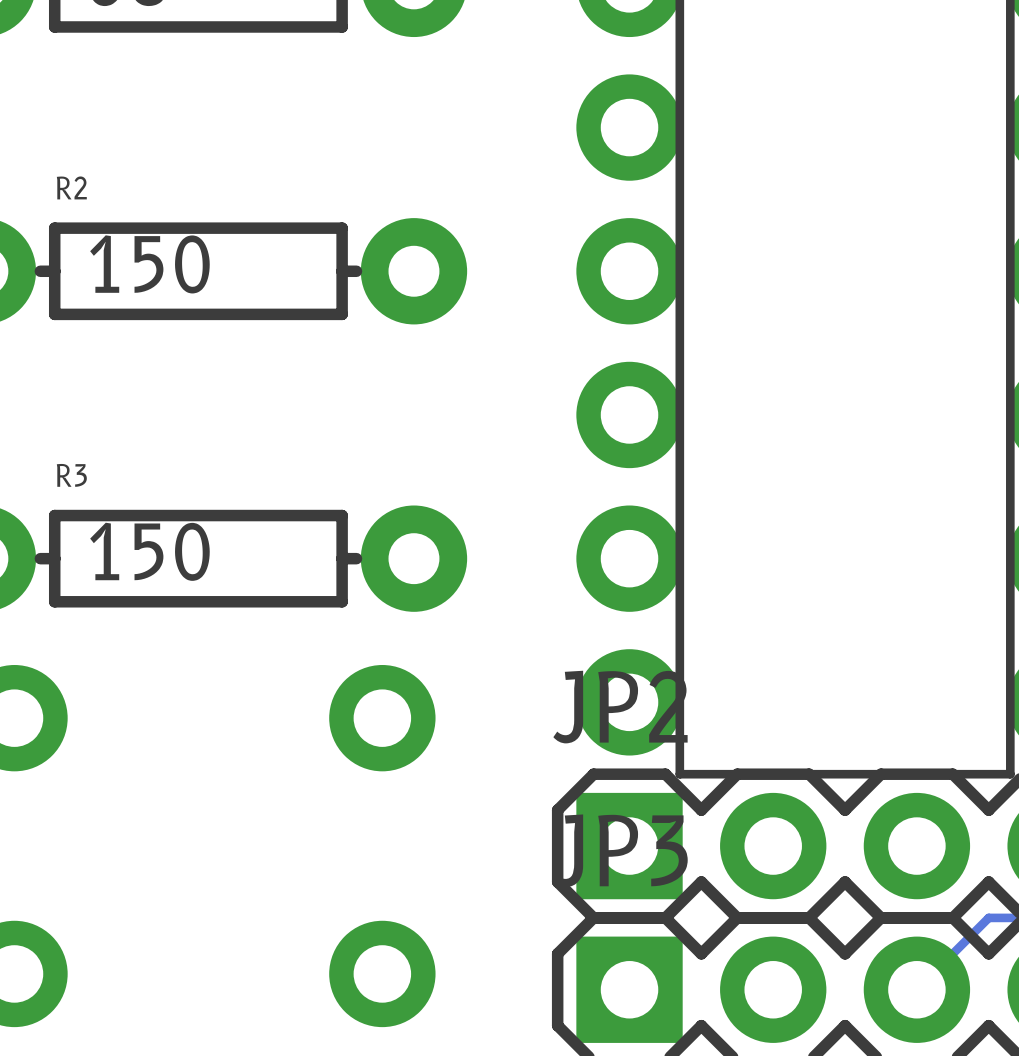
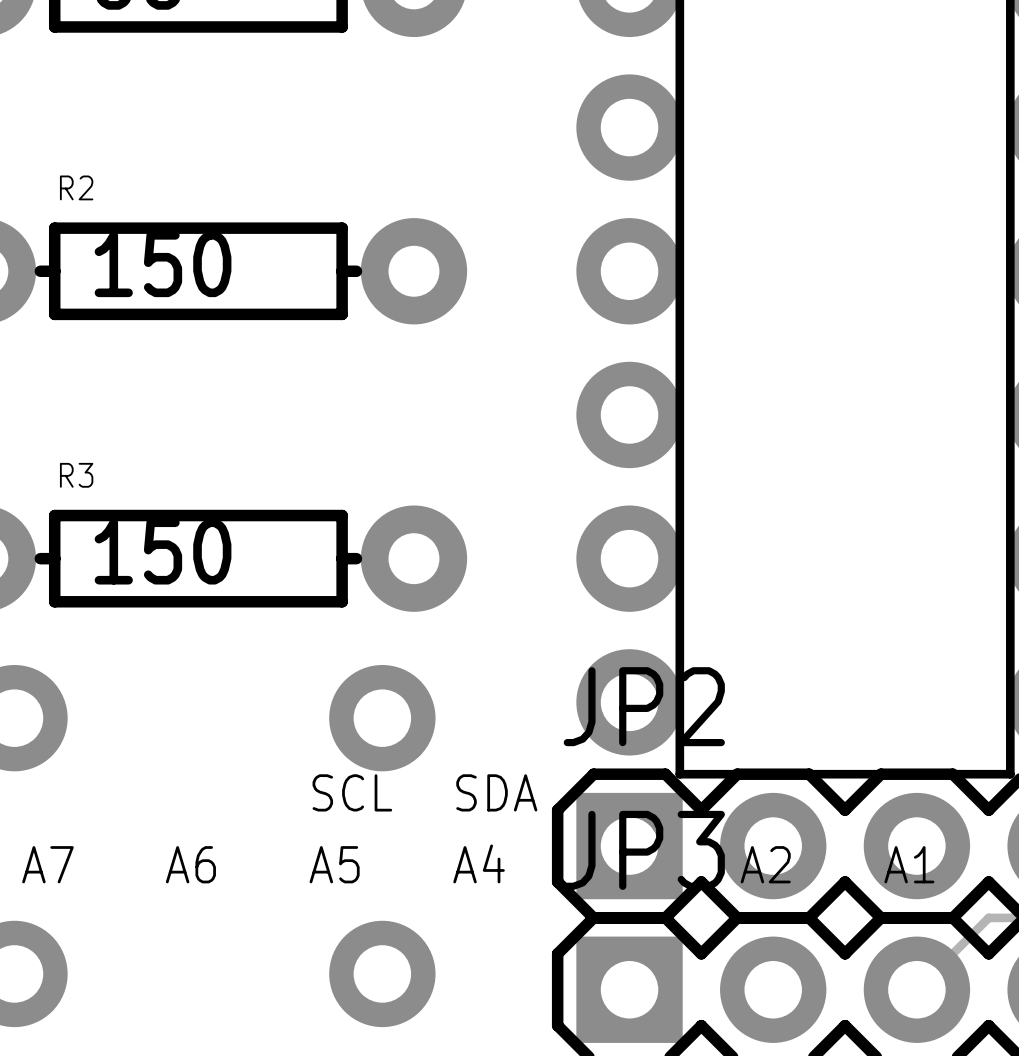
text: none -> SCL (352, 792)
text: none -> SDA (496, 792)
text: none -> A7 (47, 864)
text: none -> A6 (190, 864)
text: none -> A5 (334, 864)
text: none -> A4 (479, 863)
text: none -> A2 (765, 864)
text: none -> A1 (909, 864)

